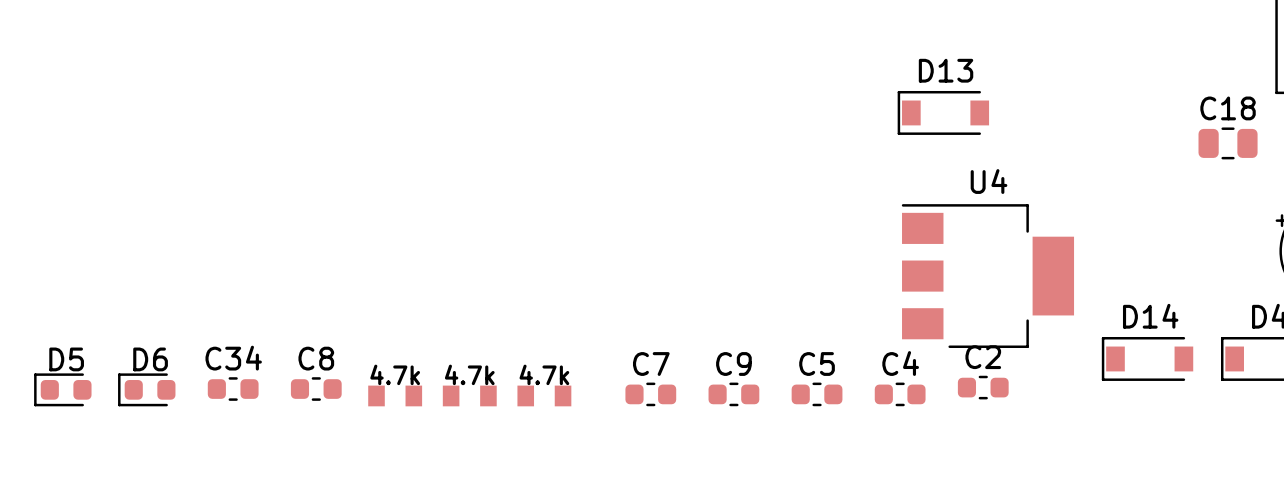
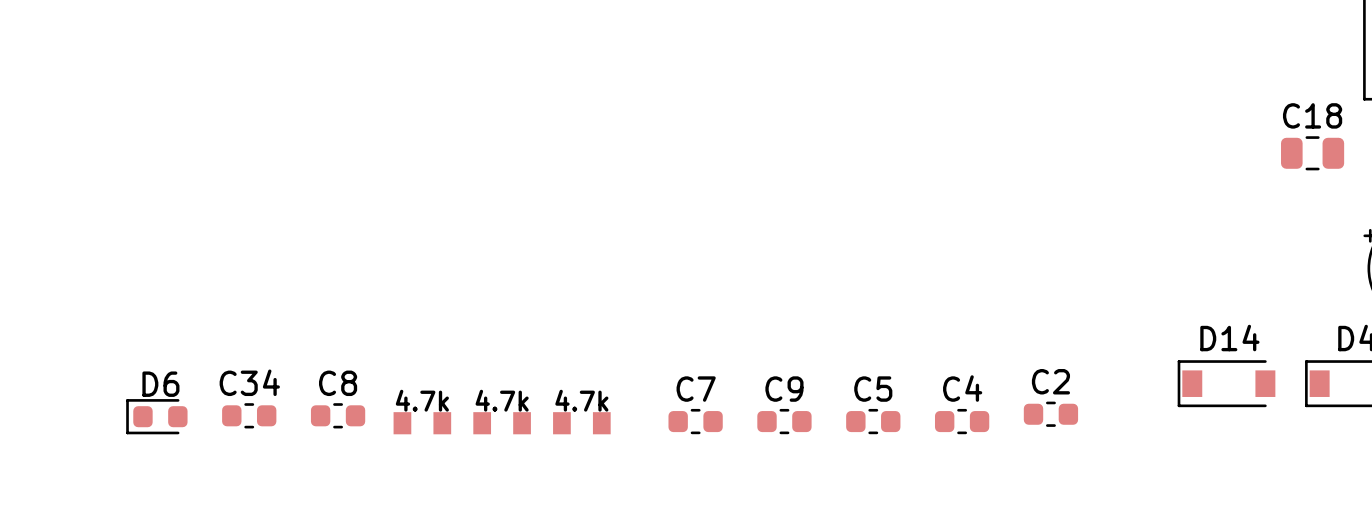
D13: (943, 112) -> none
U4: (987, 276) -> none
D5: (62, 389) -> none

